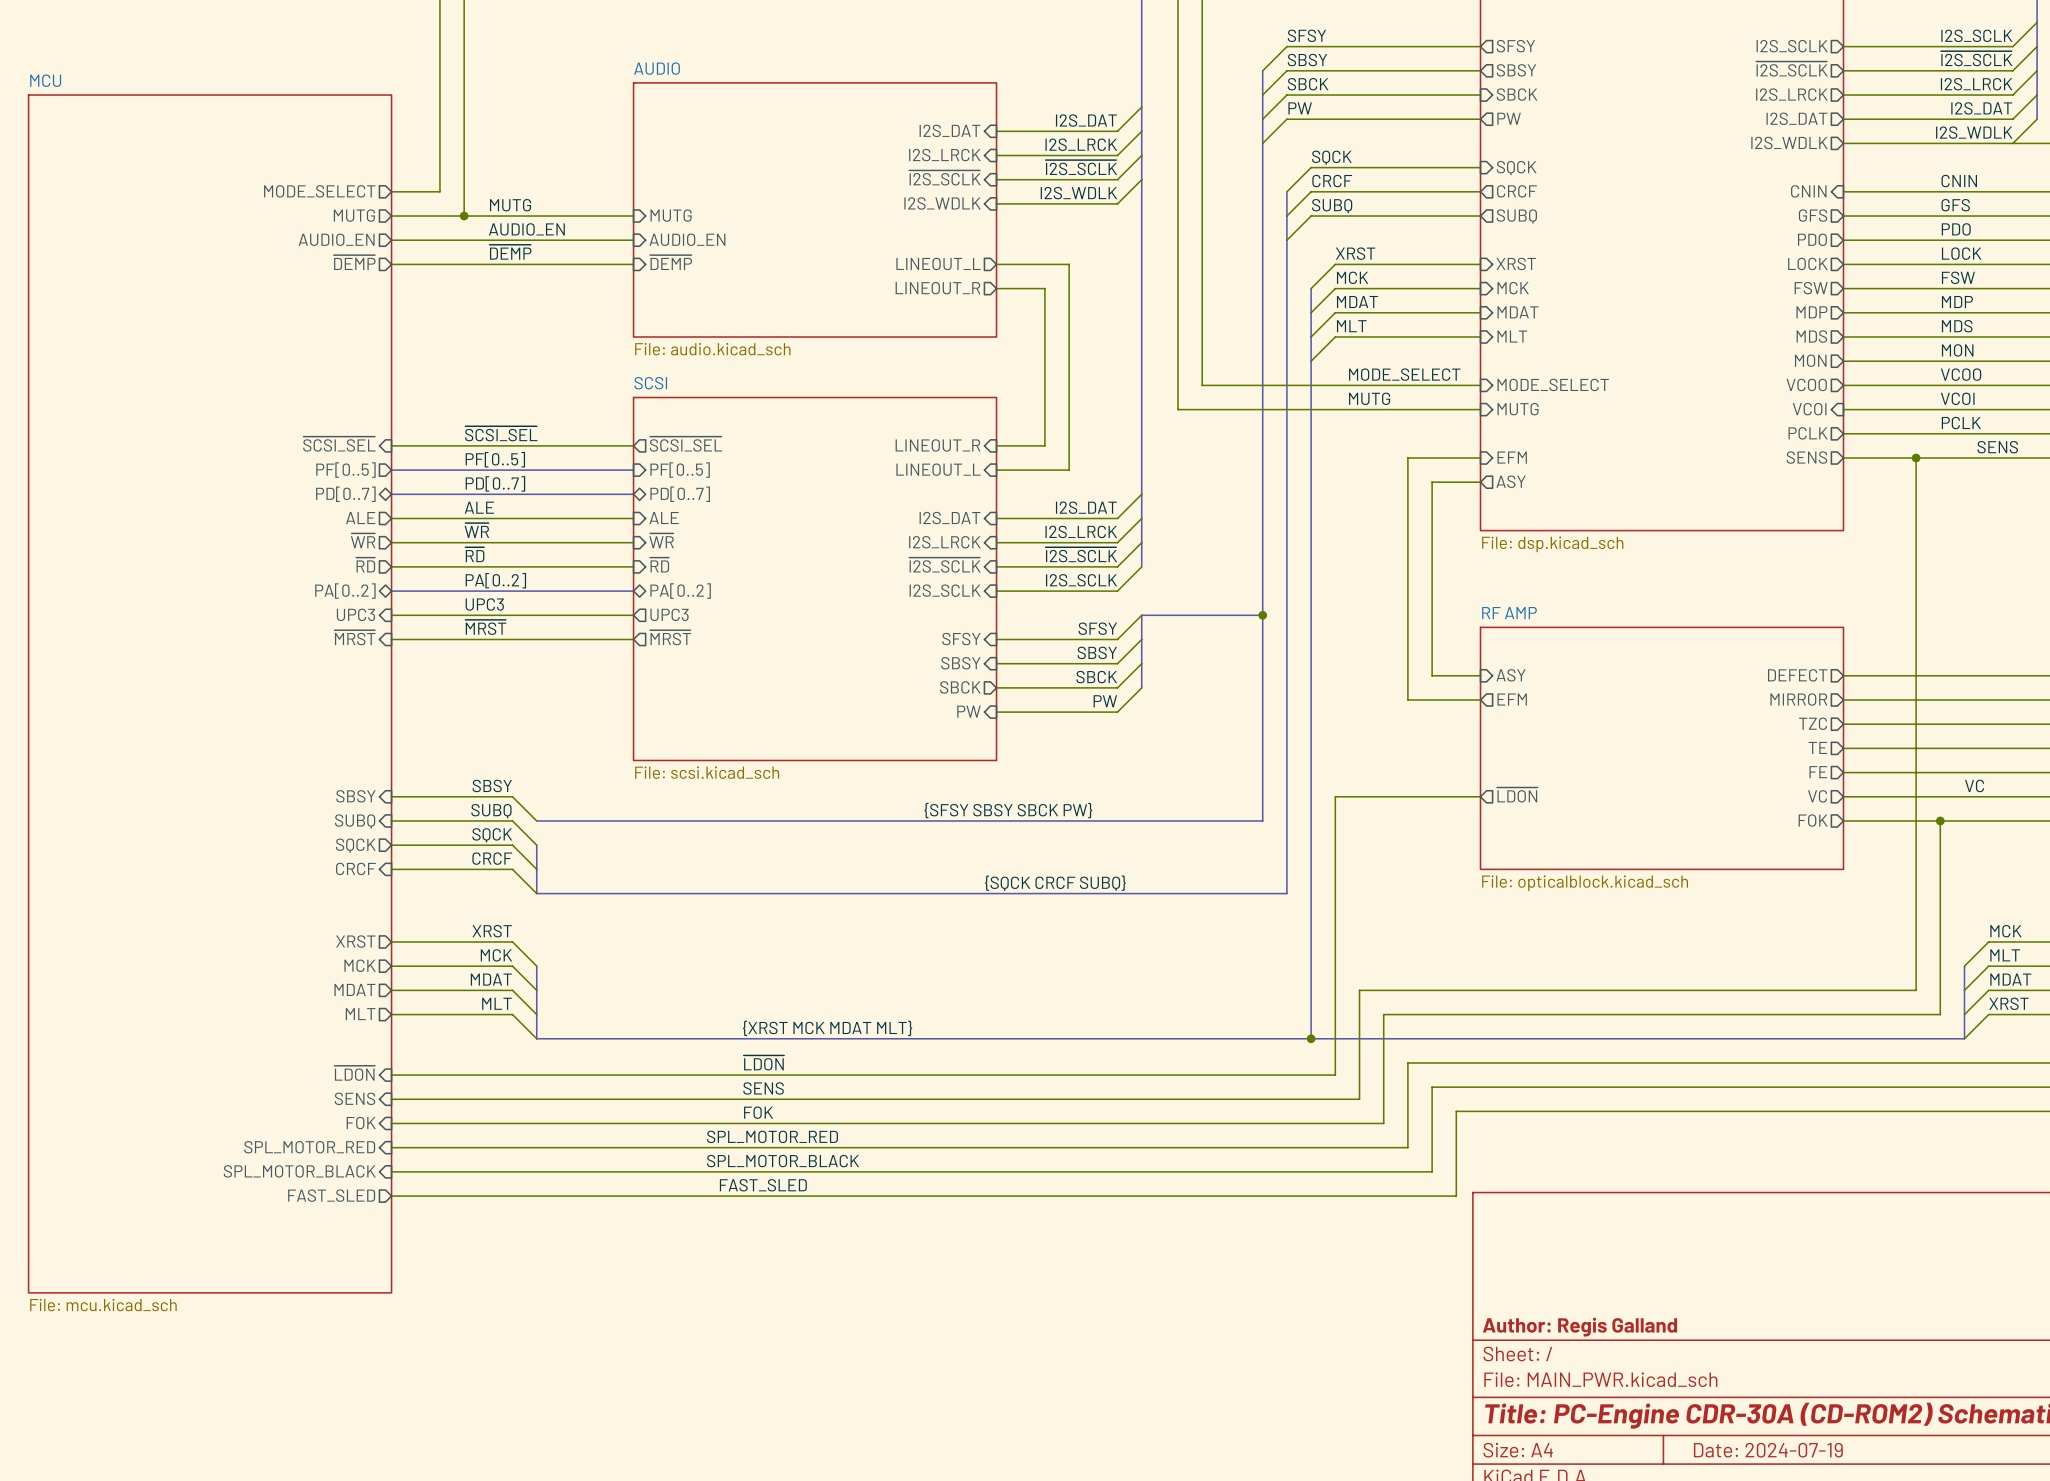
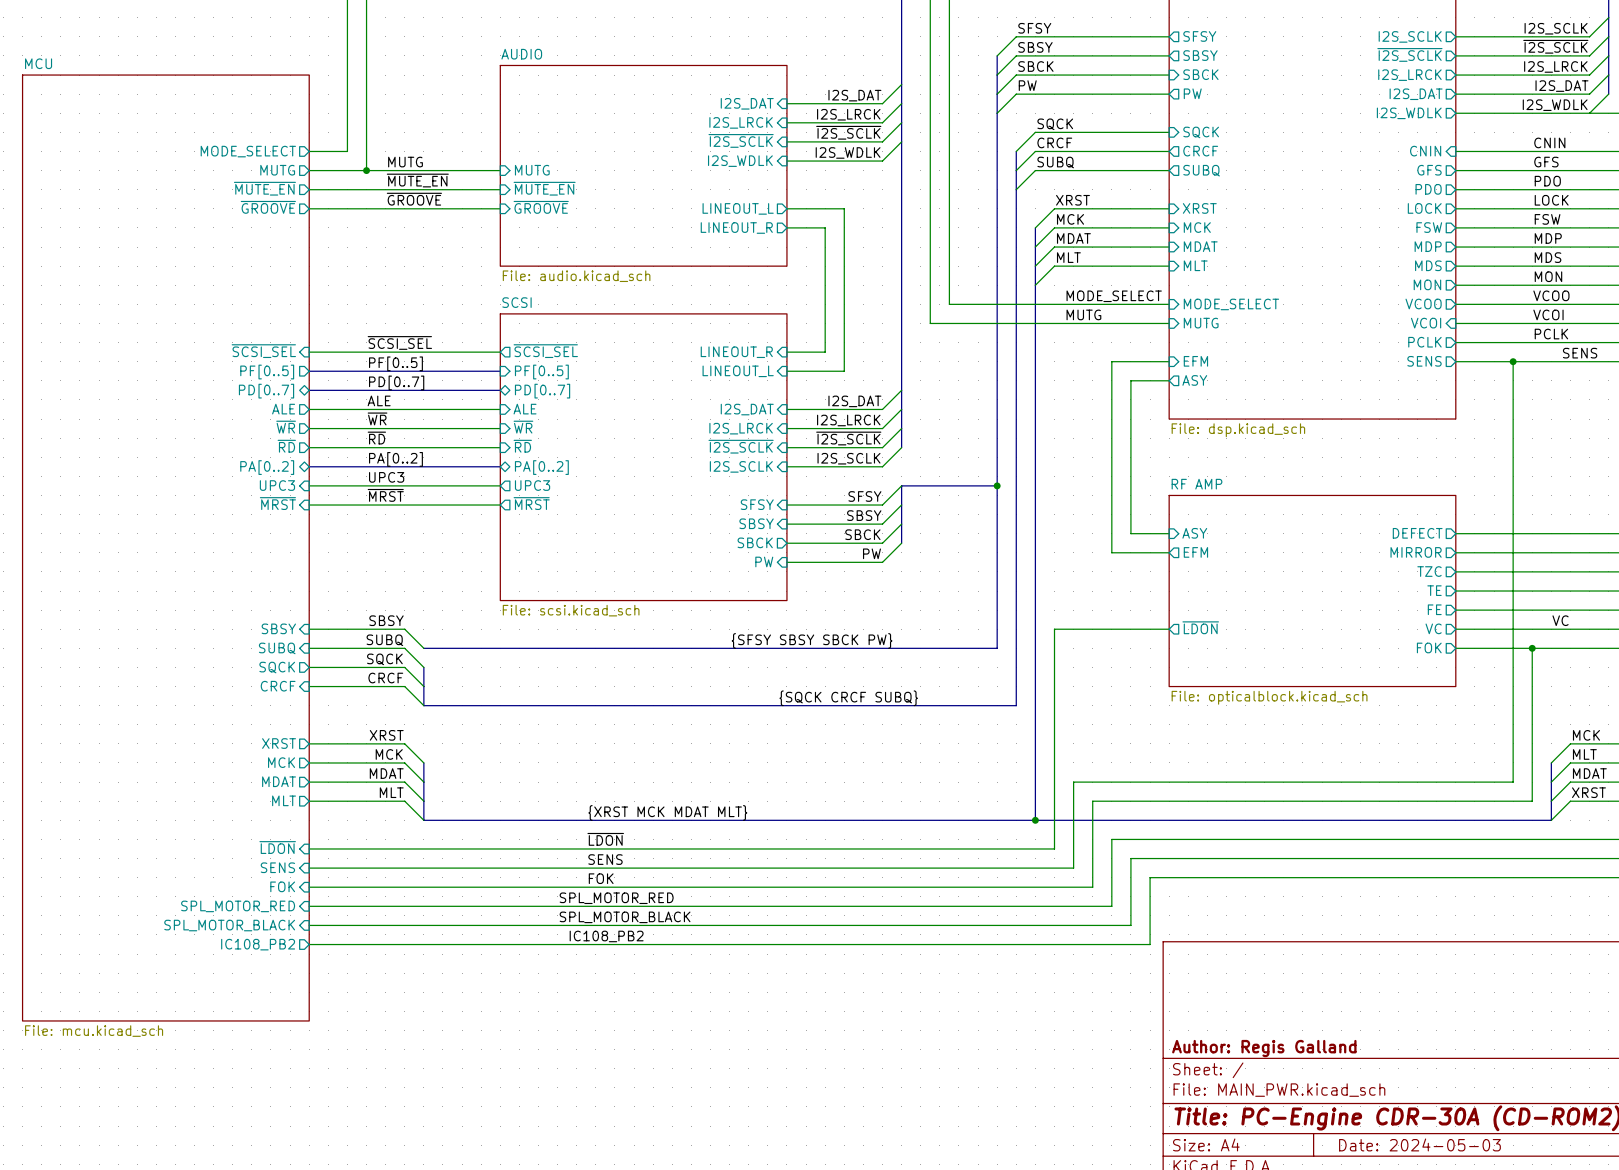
label: AUDIO_EN (526, 229) -> ~{MUTE_EN} (417, 180)
sheet pin: AUDIO_EN (336, 239) -> ~{MUTE_EN} (264, 188)
sheet pin: AUDIO_EN (687, 239) -> ~{MUTE_EN} (544, 188)
label: ~{DEMP} (510, 252) -> ~{GROOVE} (414, 199)
sheet pin: ~{DEMP} (354, 262) -> ~{GROOVE} (268, 207)
sheet pin: ~{DEMP} (671, 262) -> ~{GROOVE} (541, 207)
label: FAST_SLED (763, 1185) -> IC108_PB2 (606, 936)
sheet pin: FAST_SLED (331, 1195) -> IC108_PB2 (258, 944)
title block: Date: 2024-07-19 (1768, 1450) -> Date: 2024-05-03 (1419, 1144)

